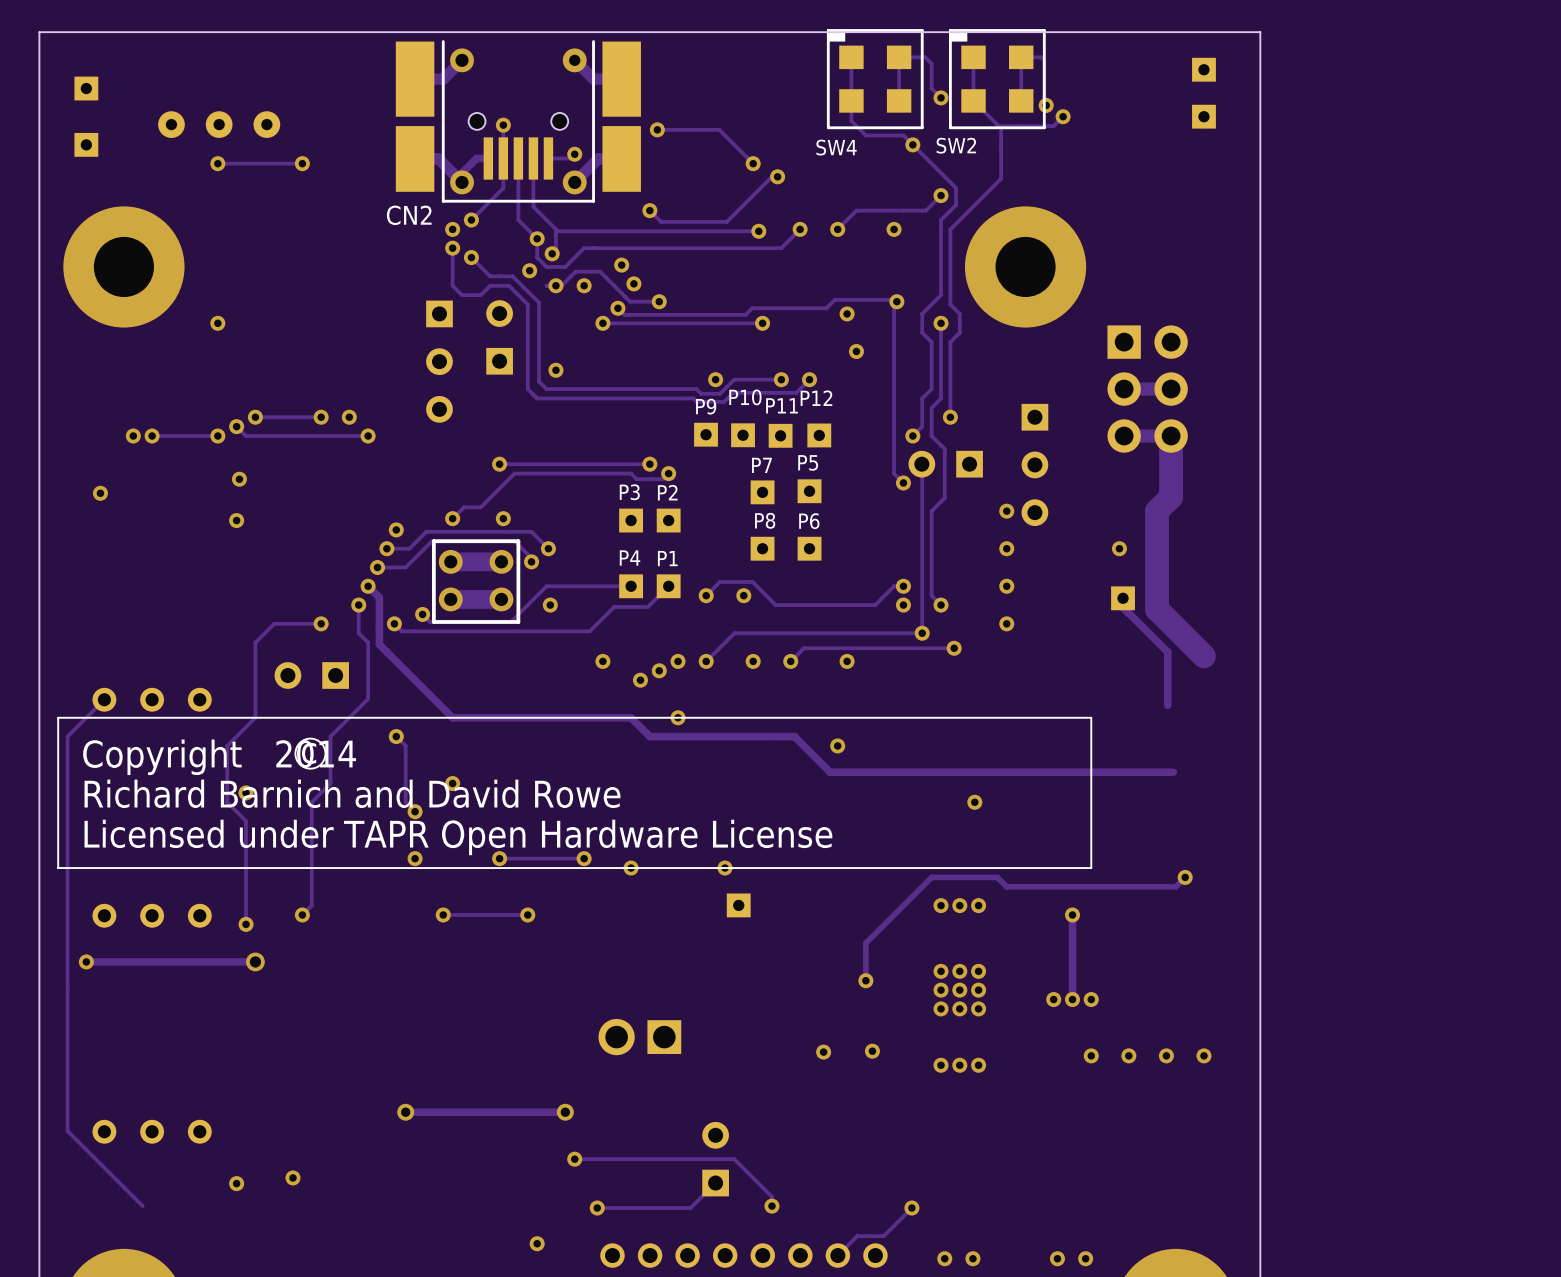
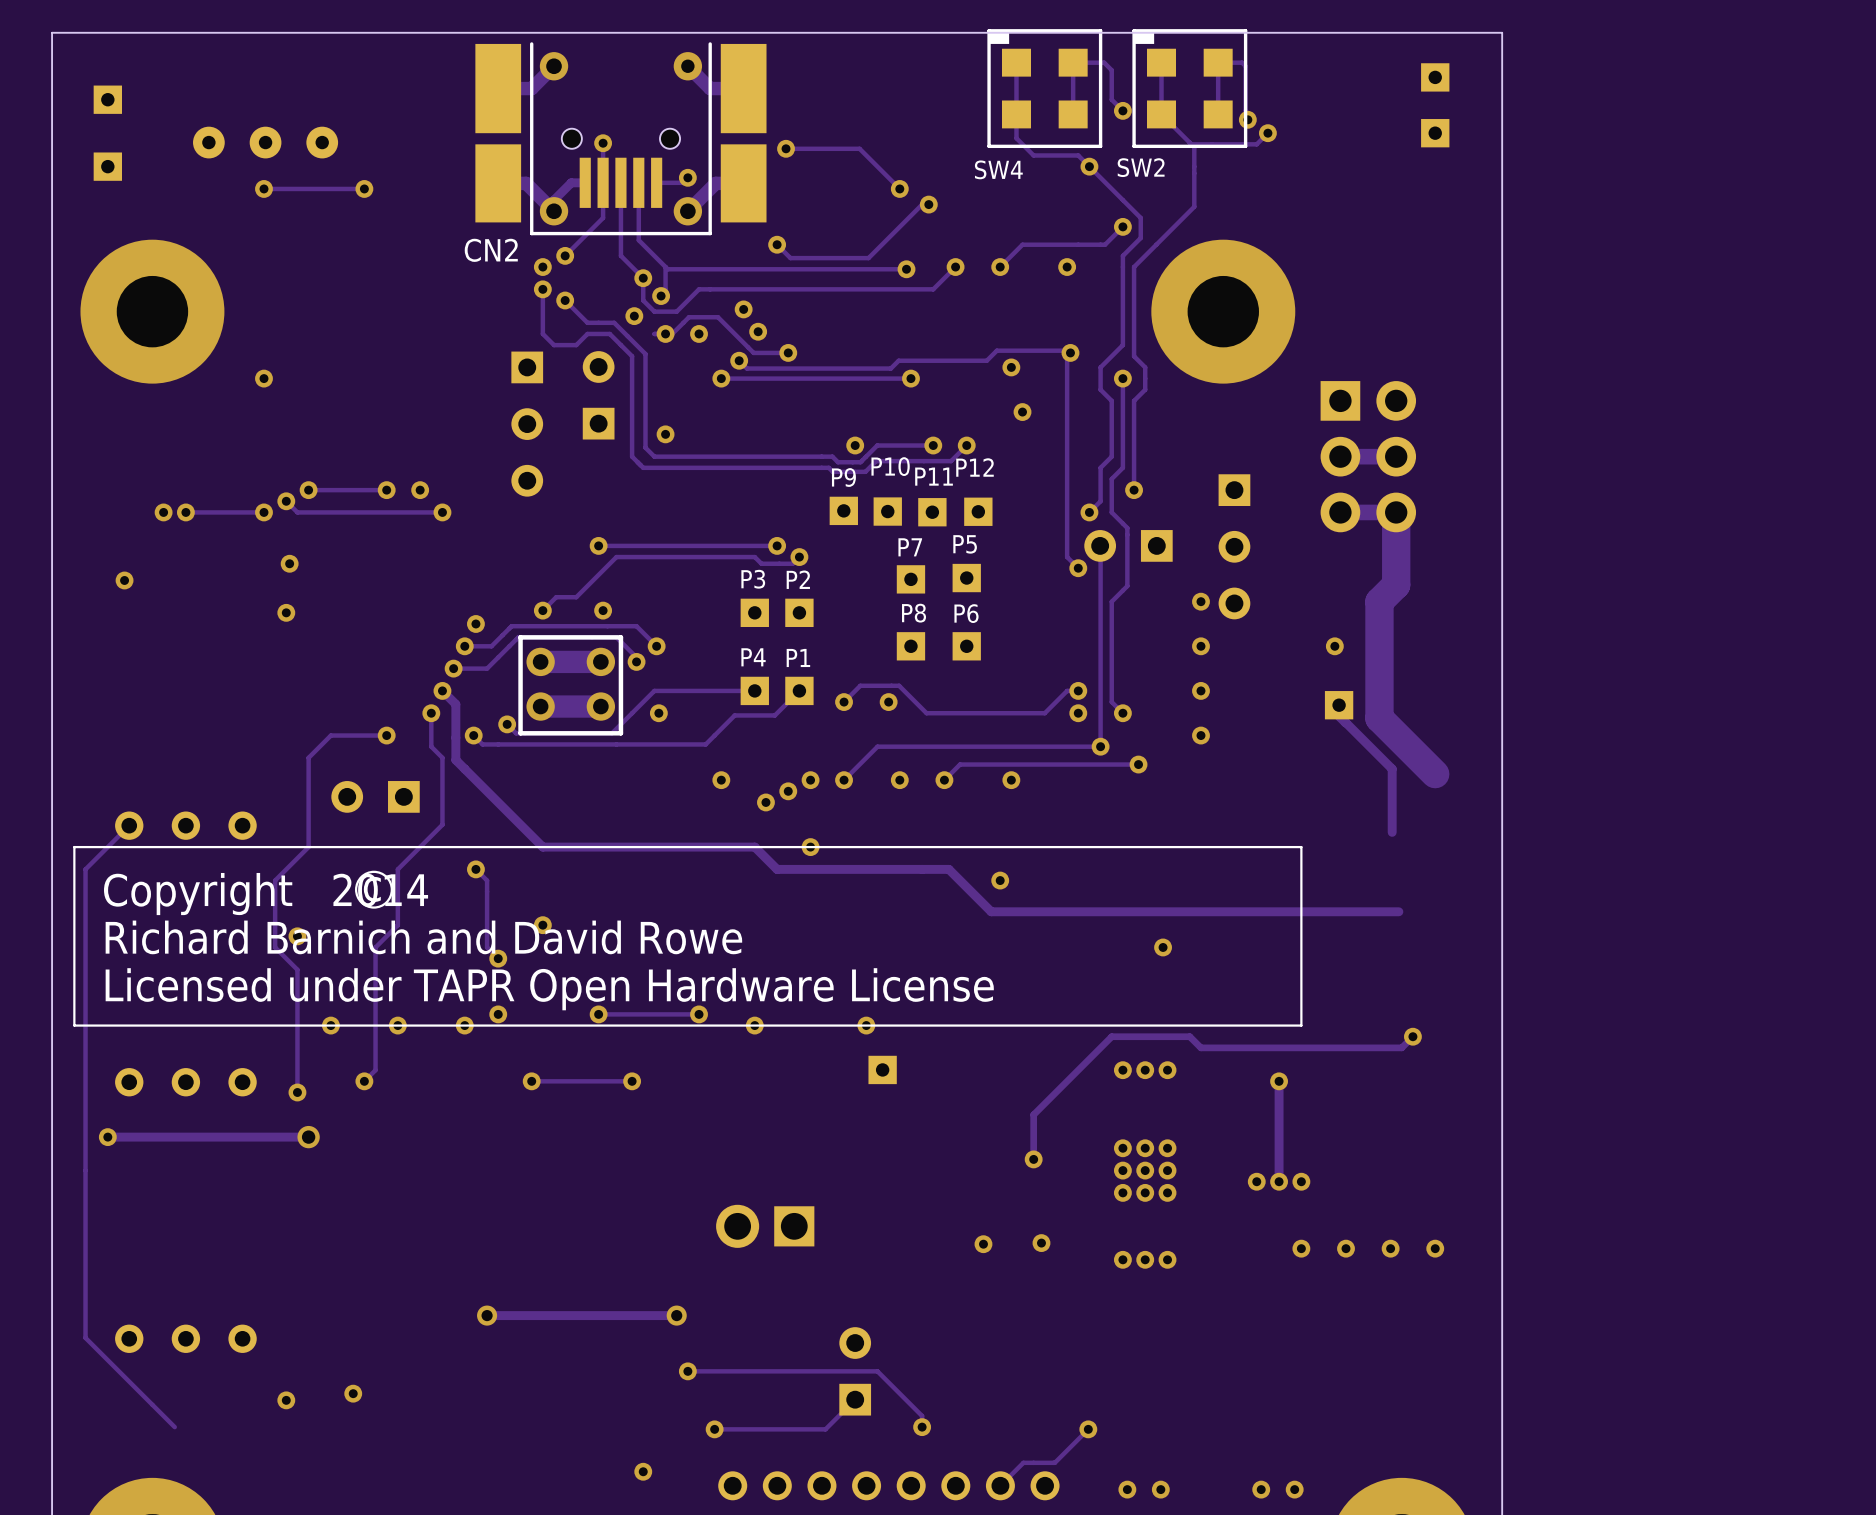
via: none -> (330, 1025)
via: none -> (397, 1025)
via: none -> (464, 1025)

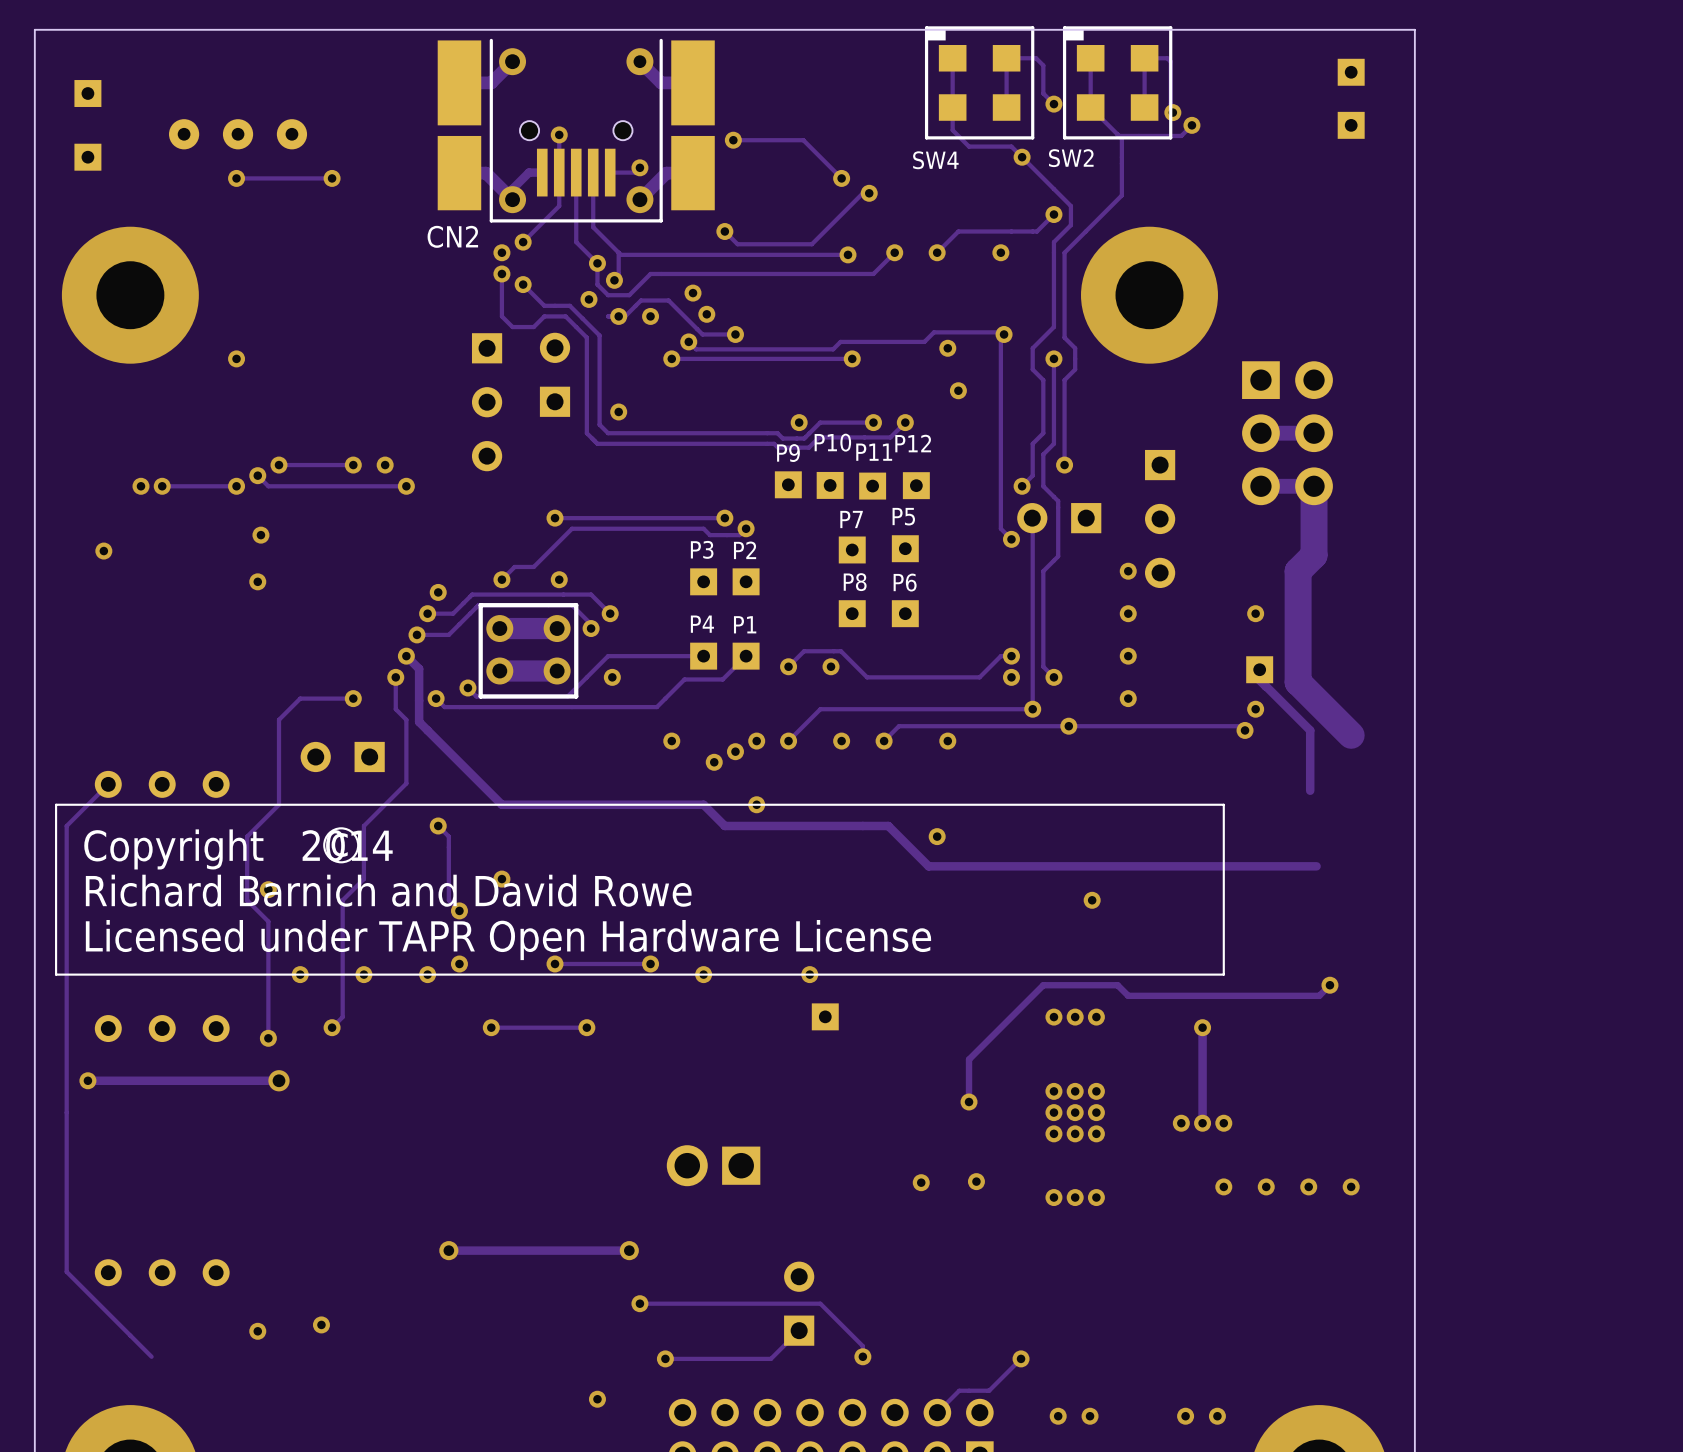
via: none -> (1255, 709)
track: none -> (1068, 726) (1240, 726) (1245, 730)
via: none -> (1245, 730)

